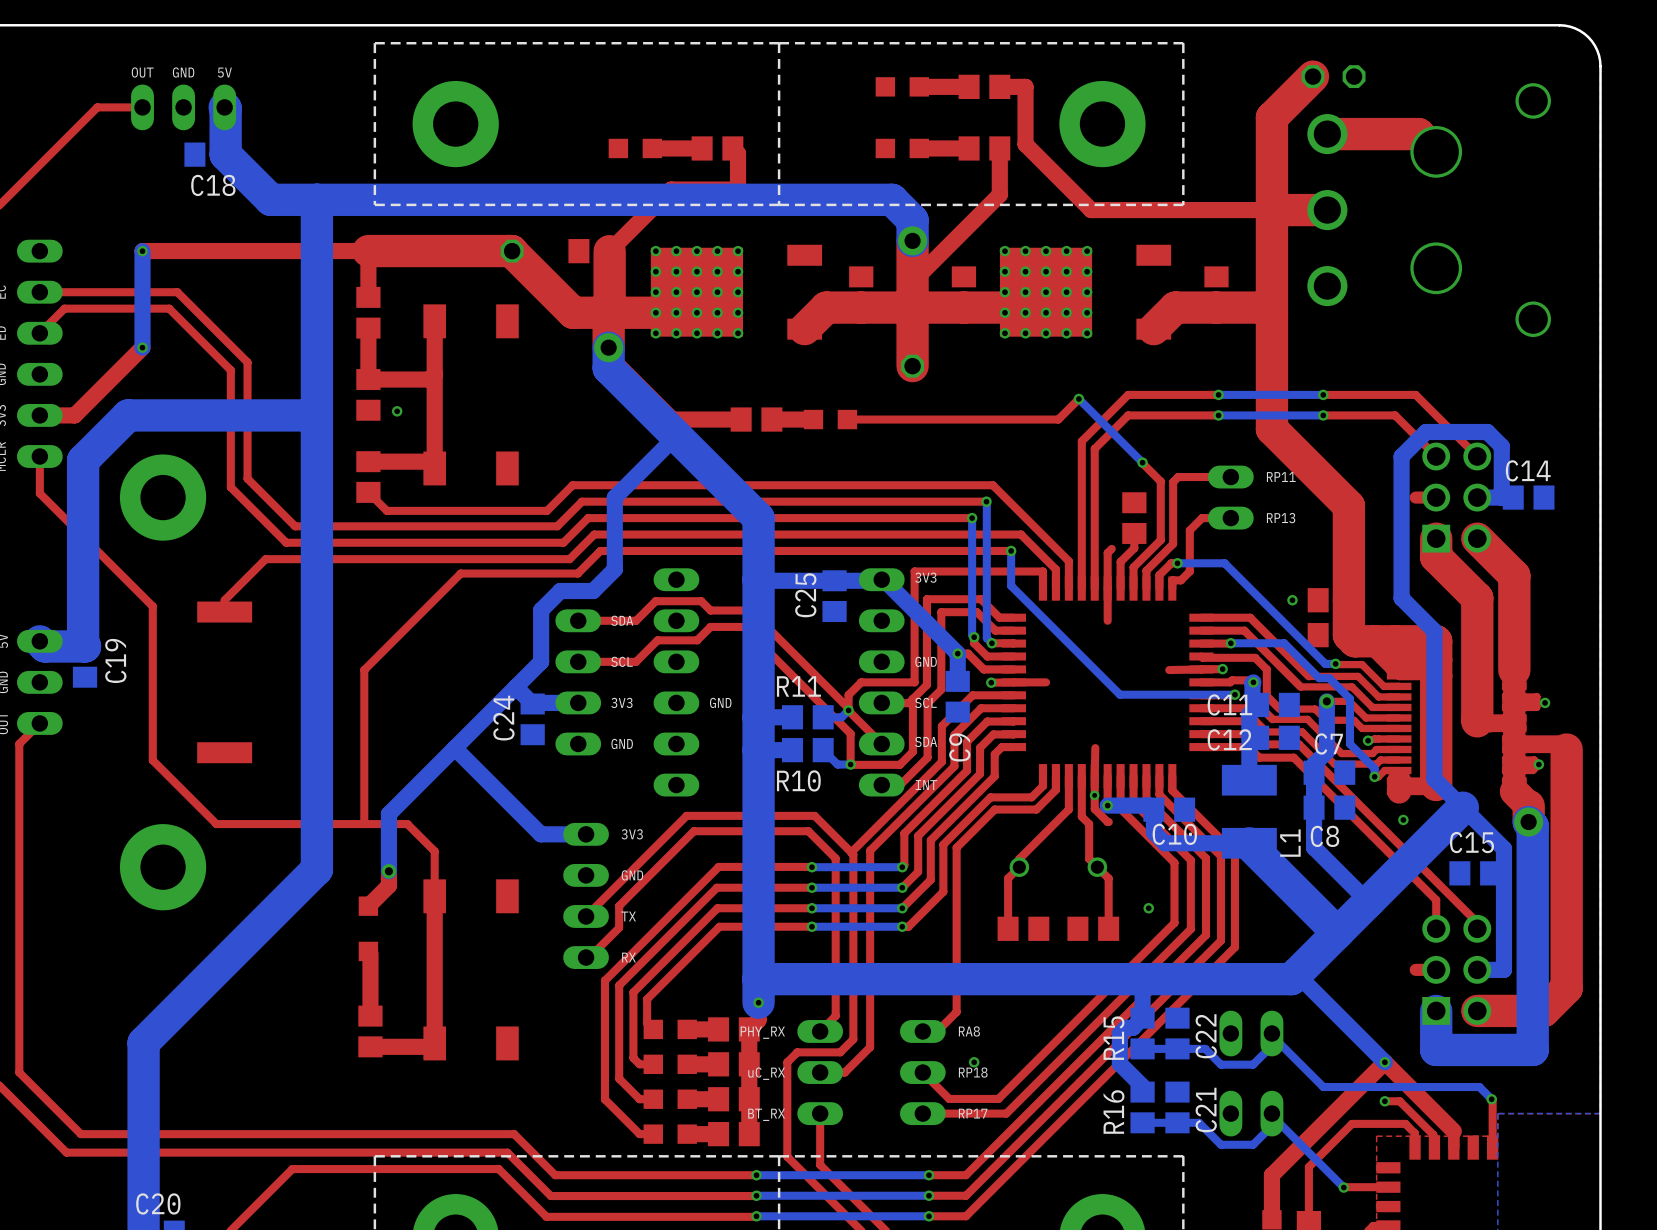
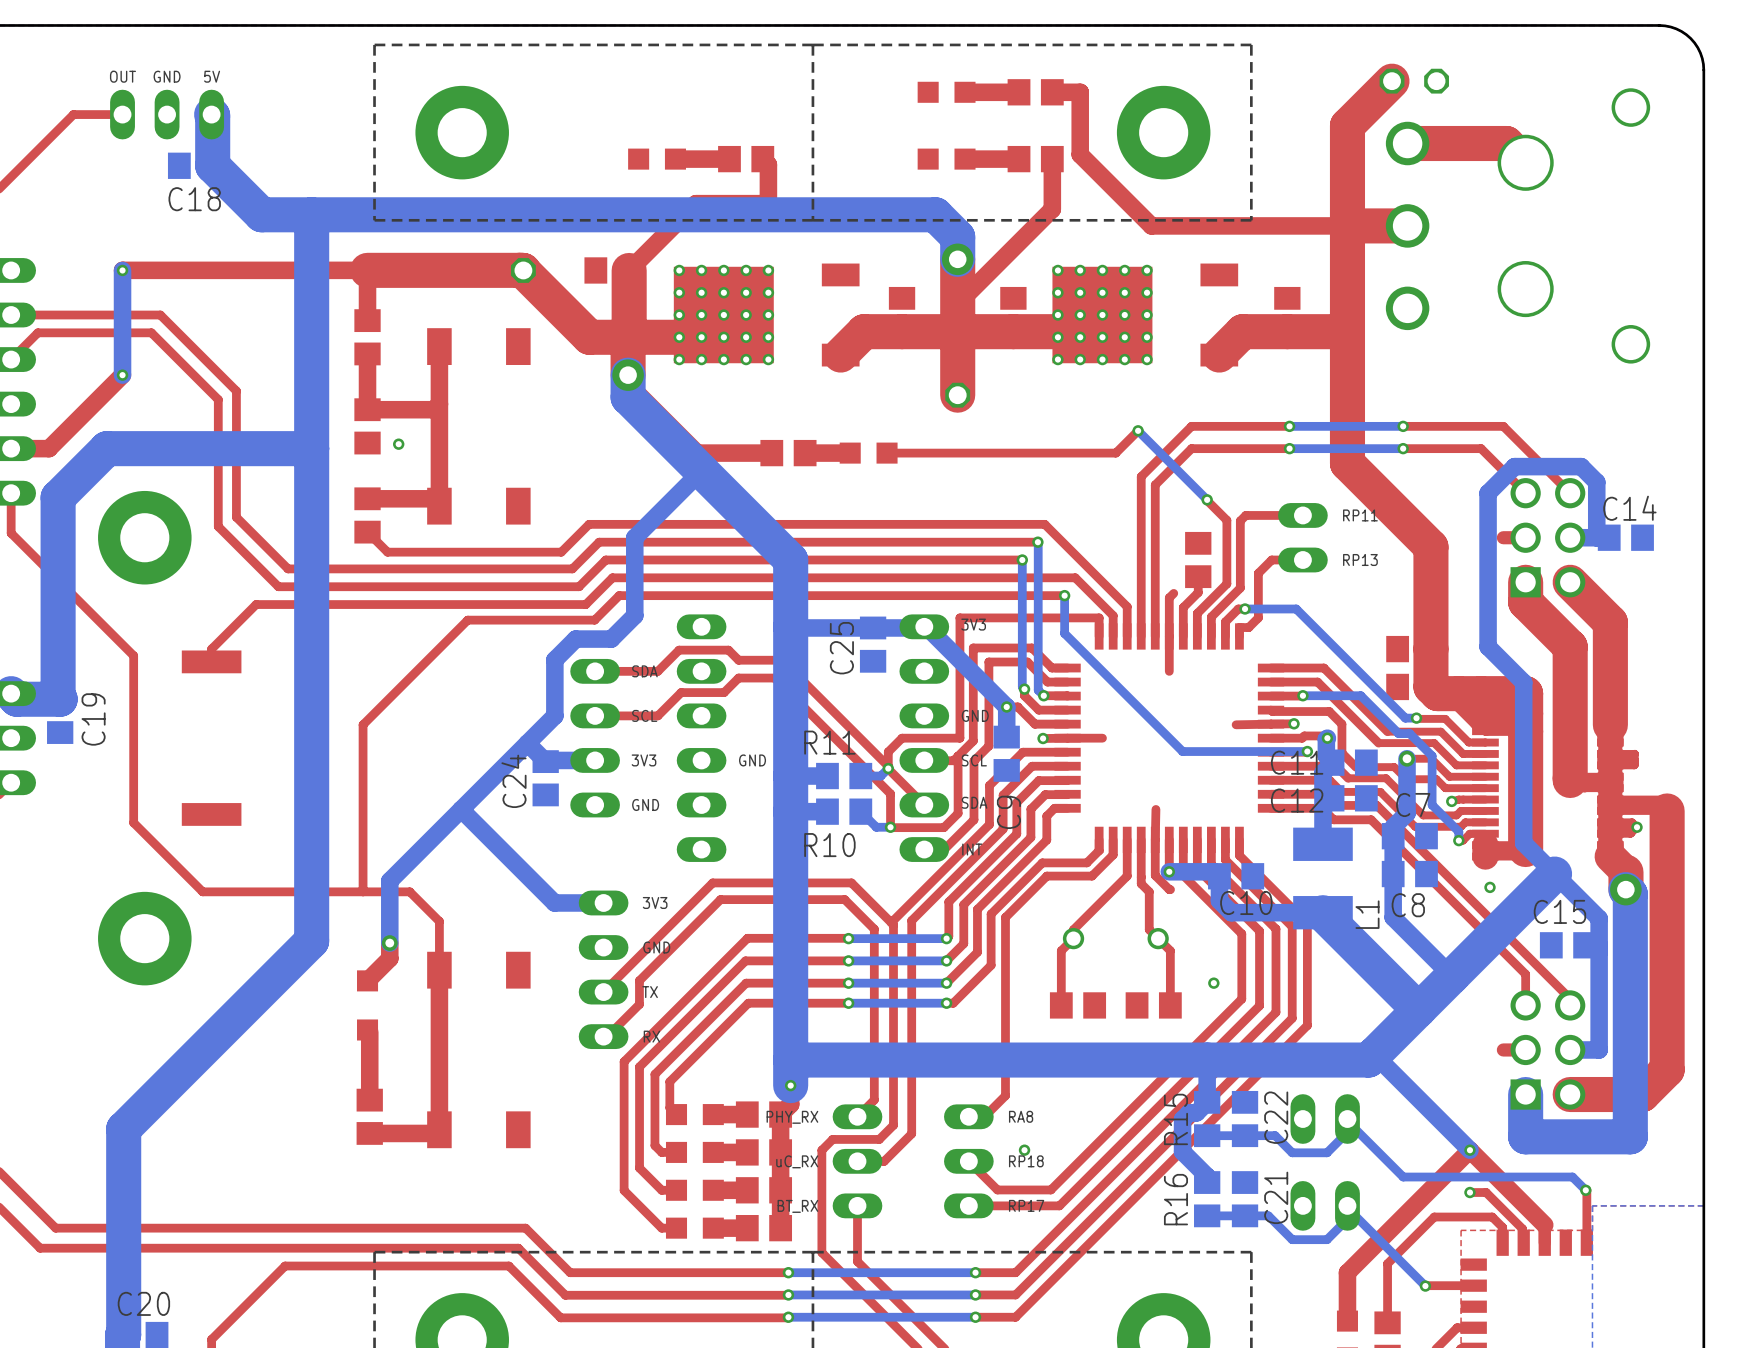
via: (1292, 600) -> none
via: (1545, 702) -> none
via: (1094, 795) -> none

